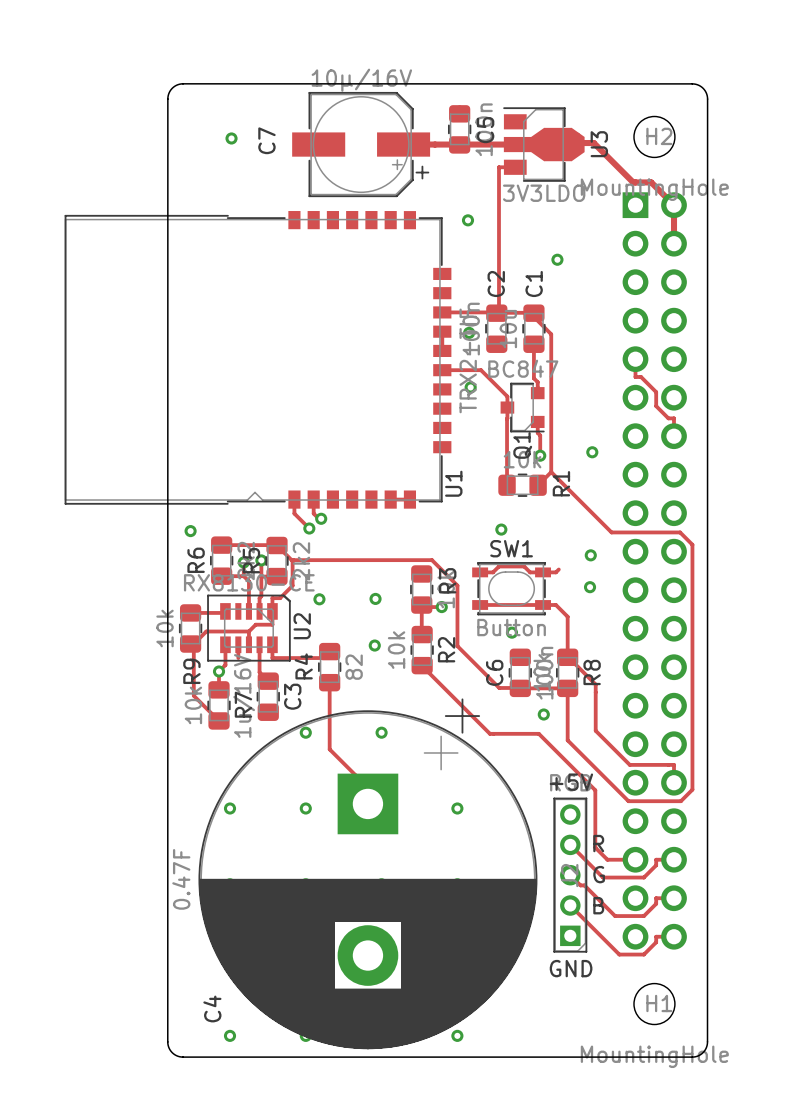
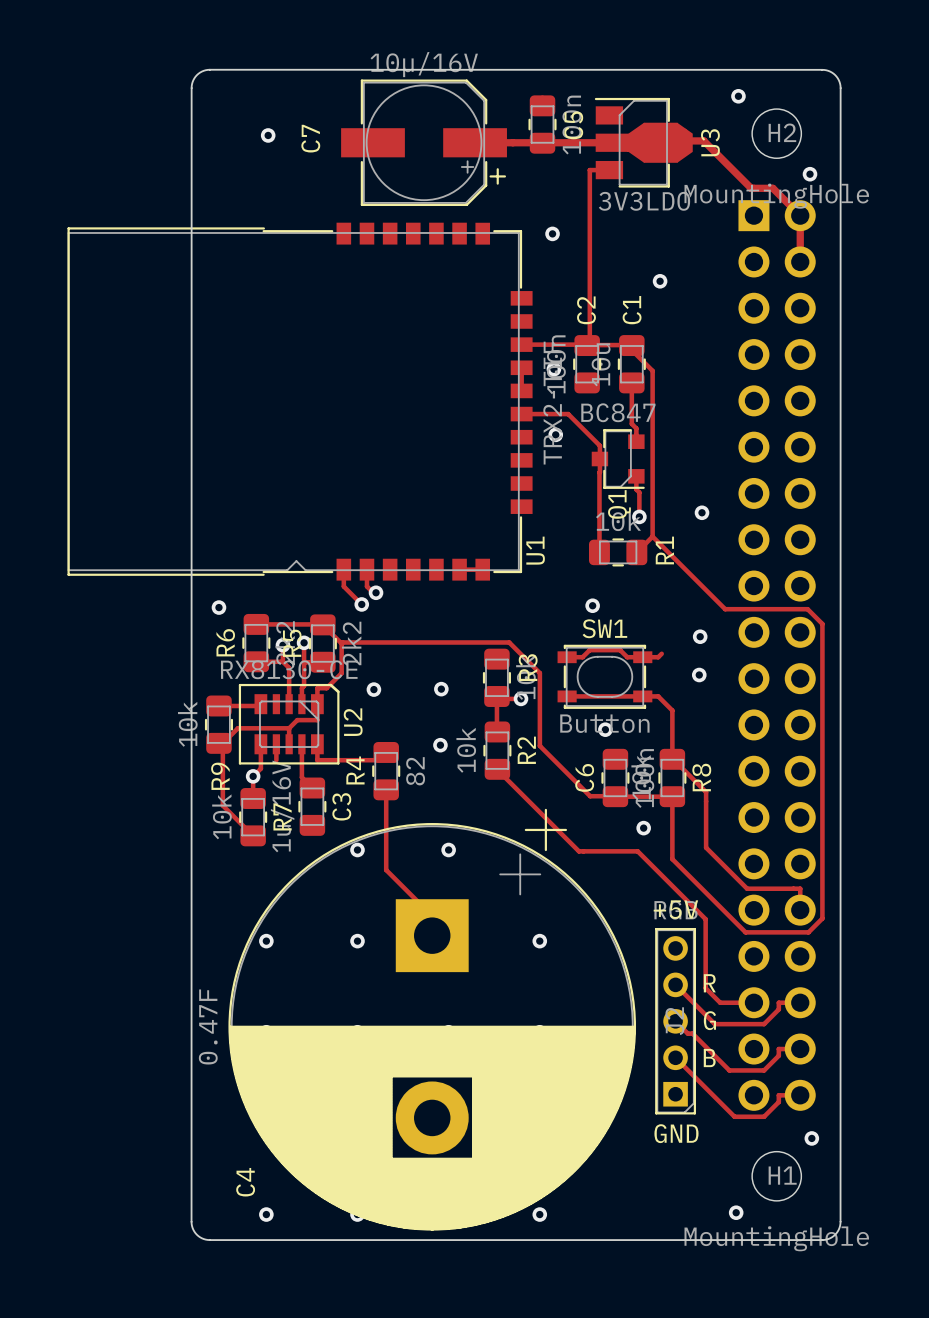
via: none -> (738, 96)
via: none -> (810, 174)
track: (635, 359) (635, 377) (641, 377) (656, 392) (656, 406) (668, 418) (674, 418) (674, 436) -> none
via: none -> (811, 1138)
via: none -> (736, 1212)

